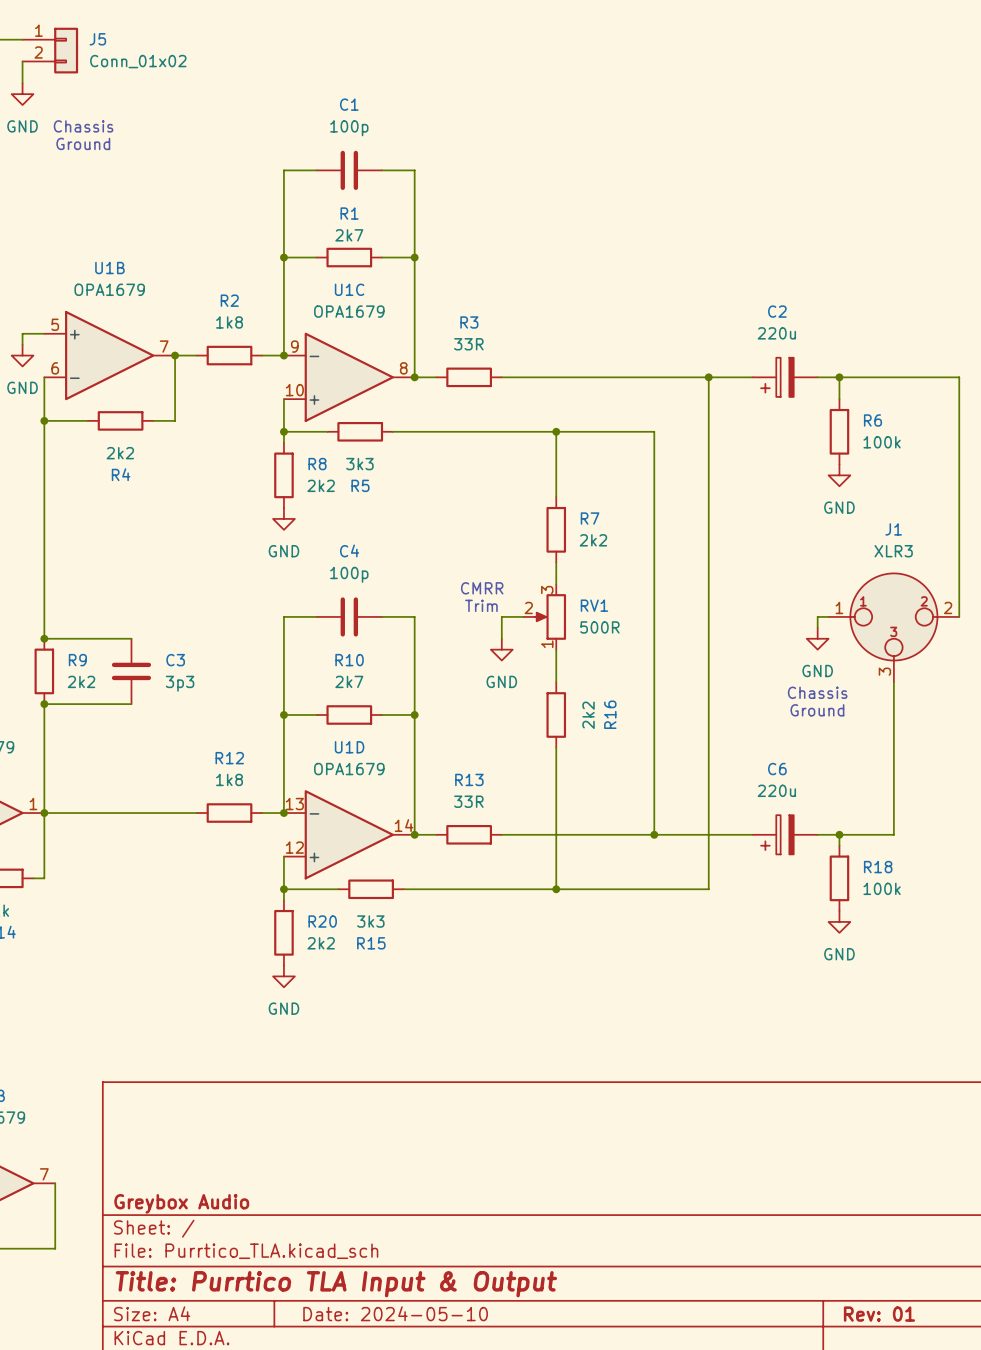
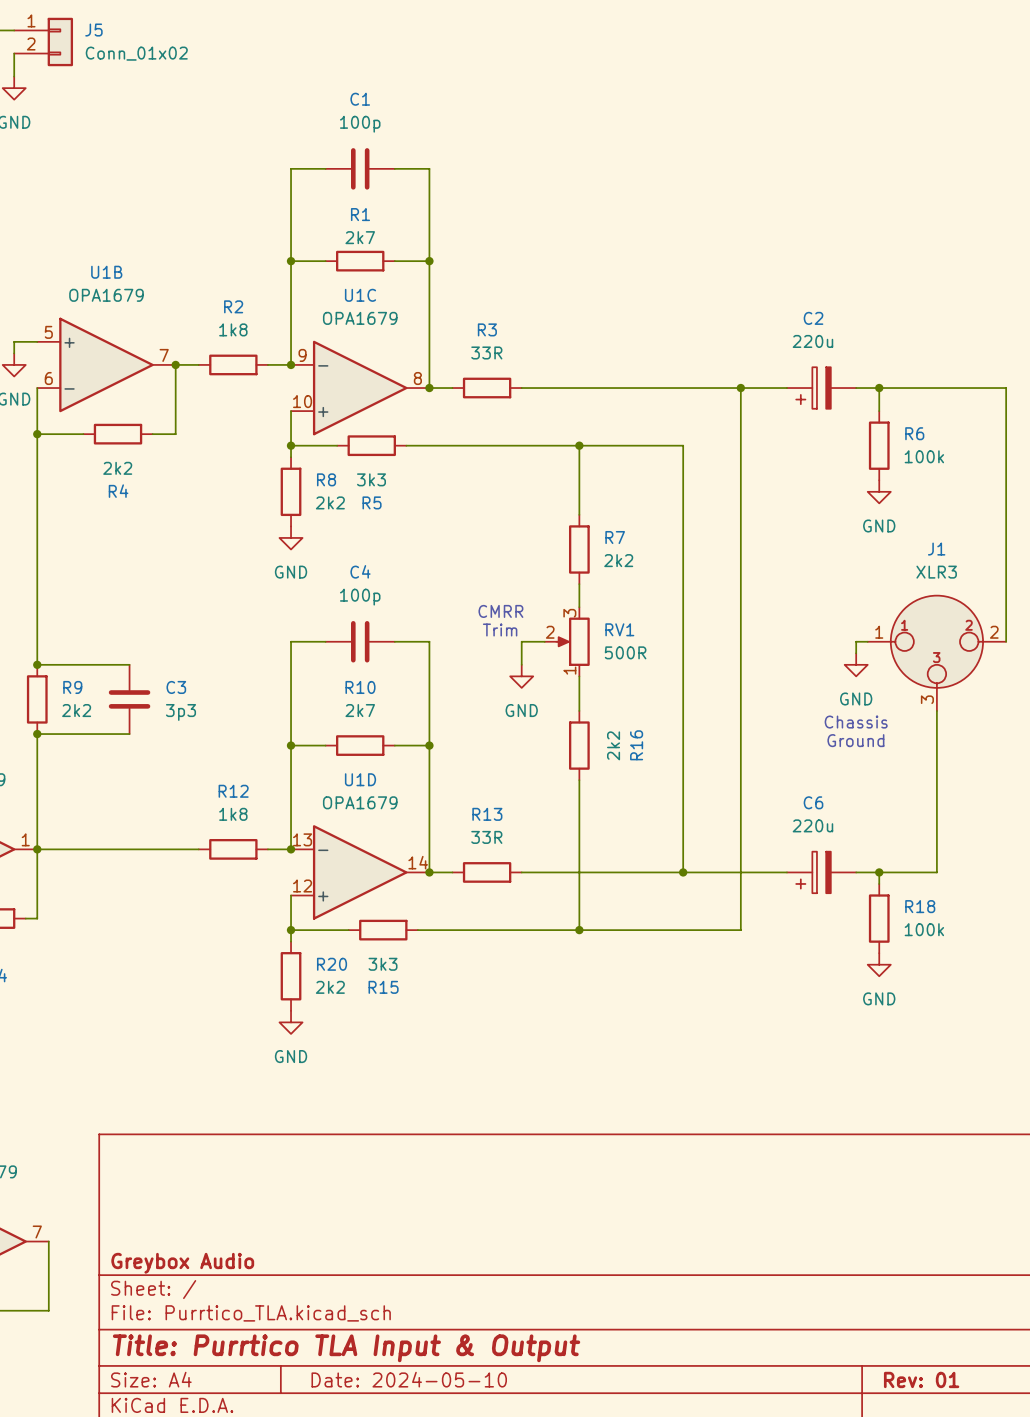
text: Chassis (83, 126) -> none
text: Ground (83, 143) -> none

